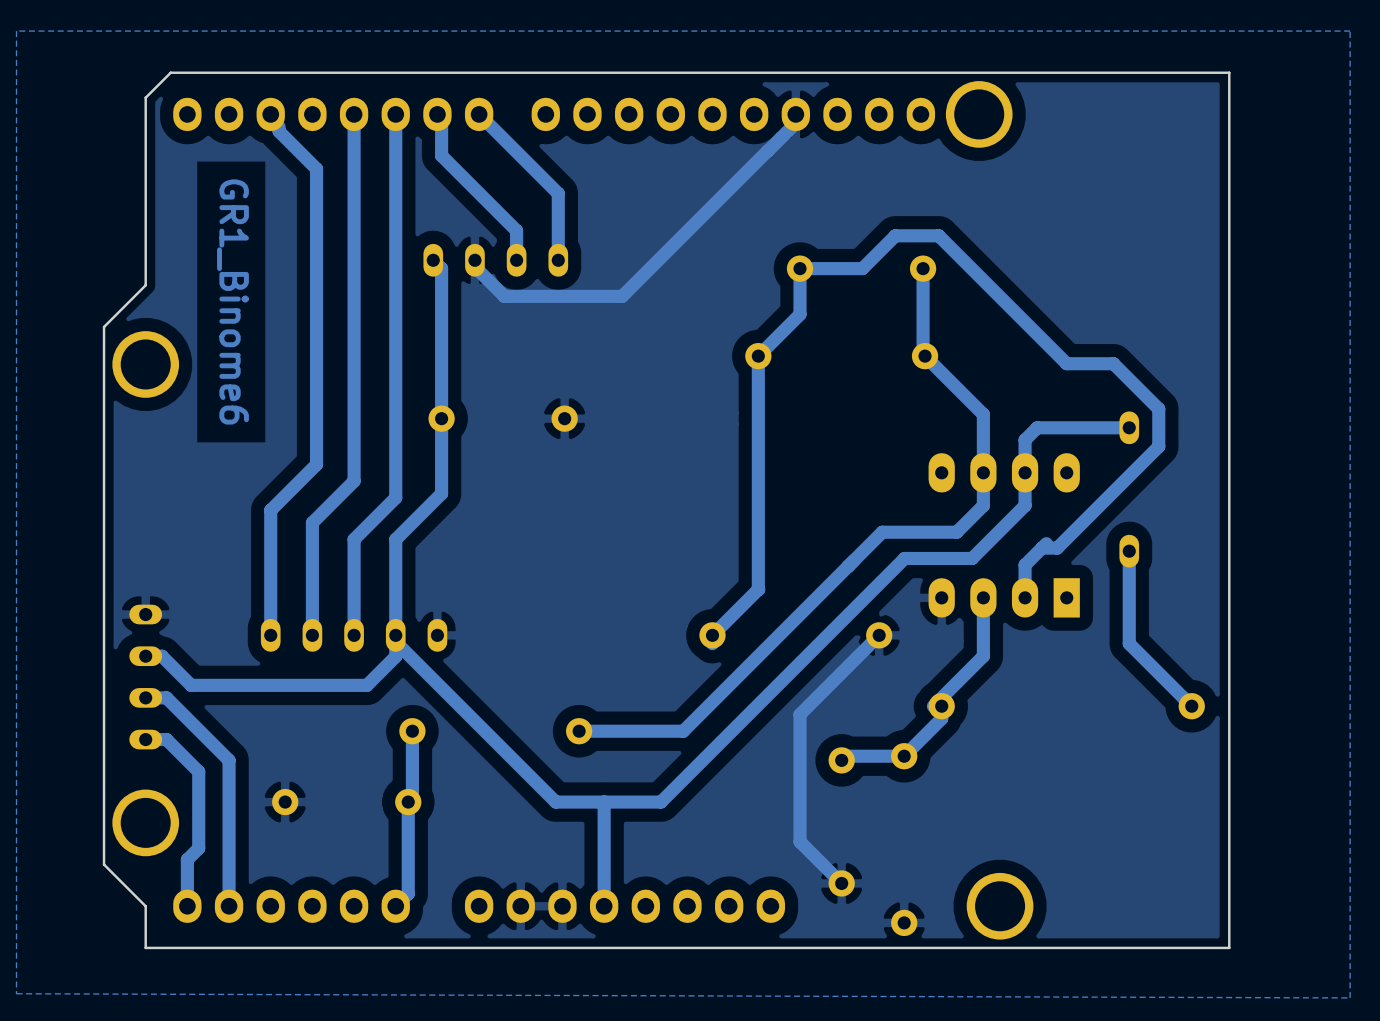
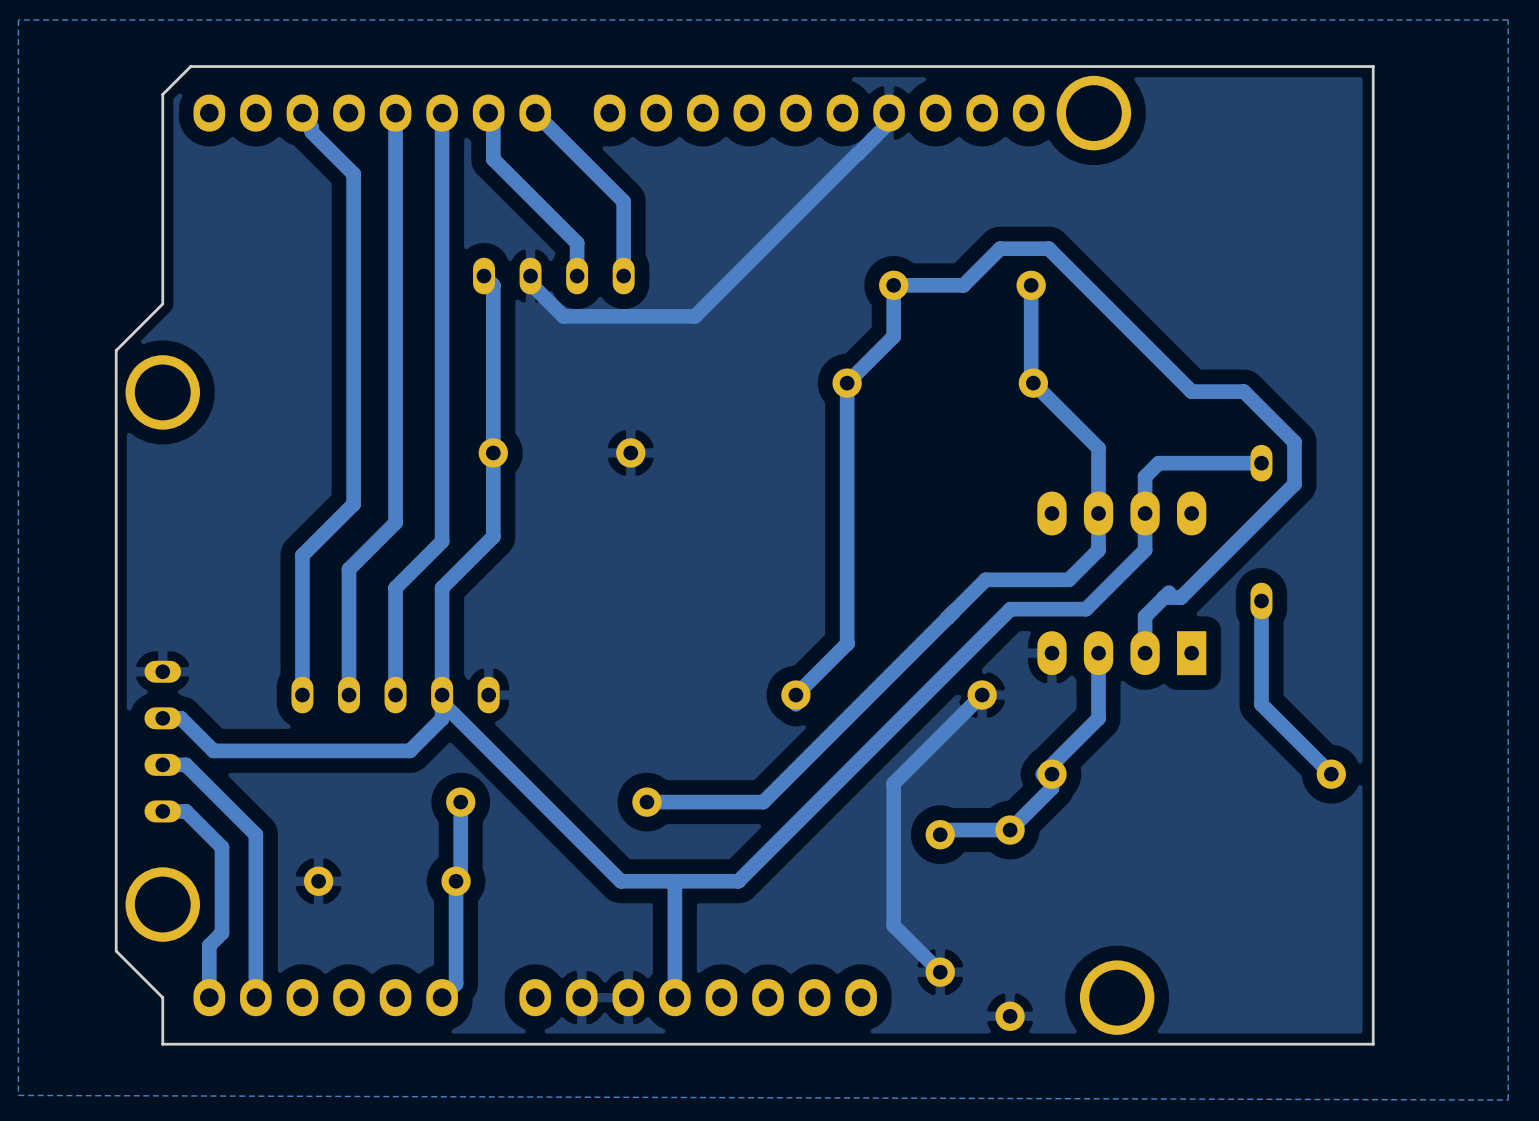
text: GR1_Binome6 (232, 301) -> none

